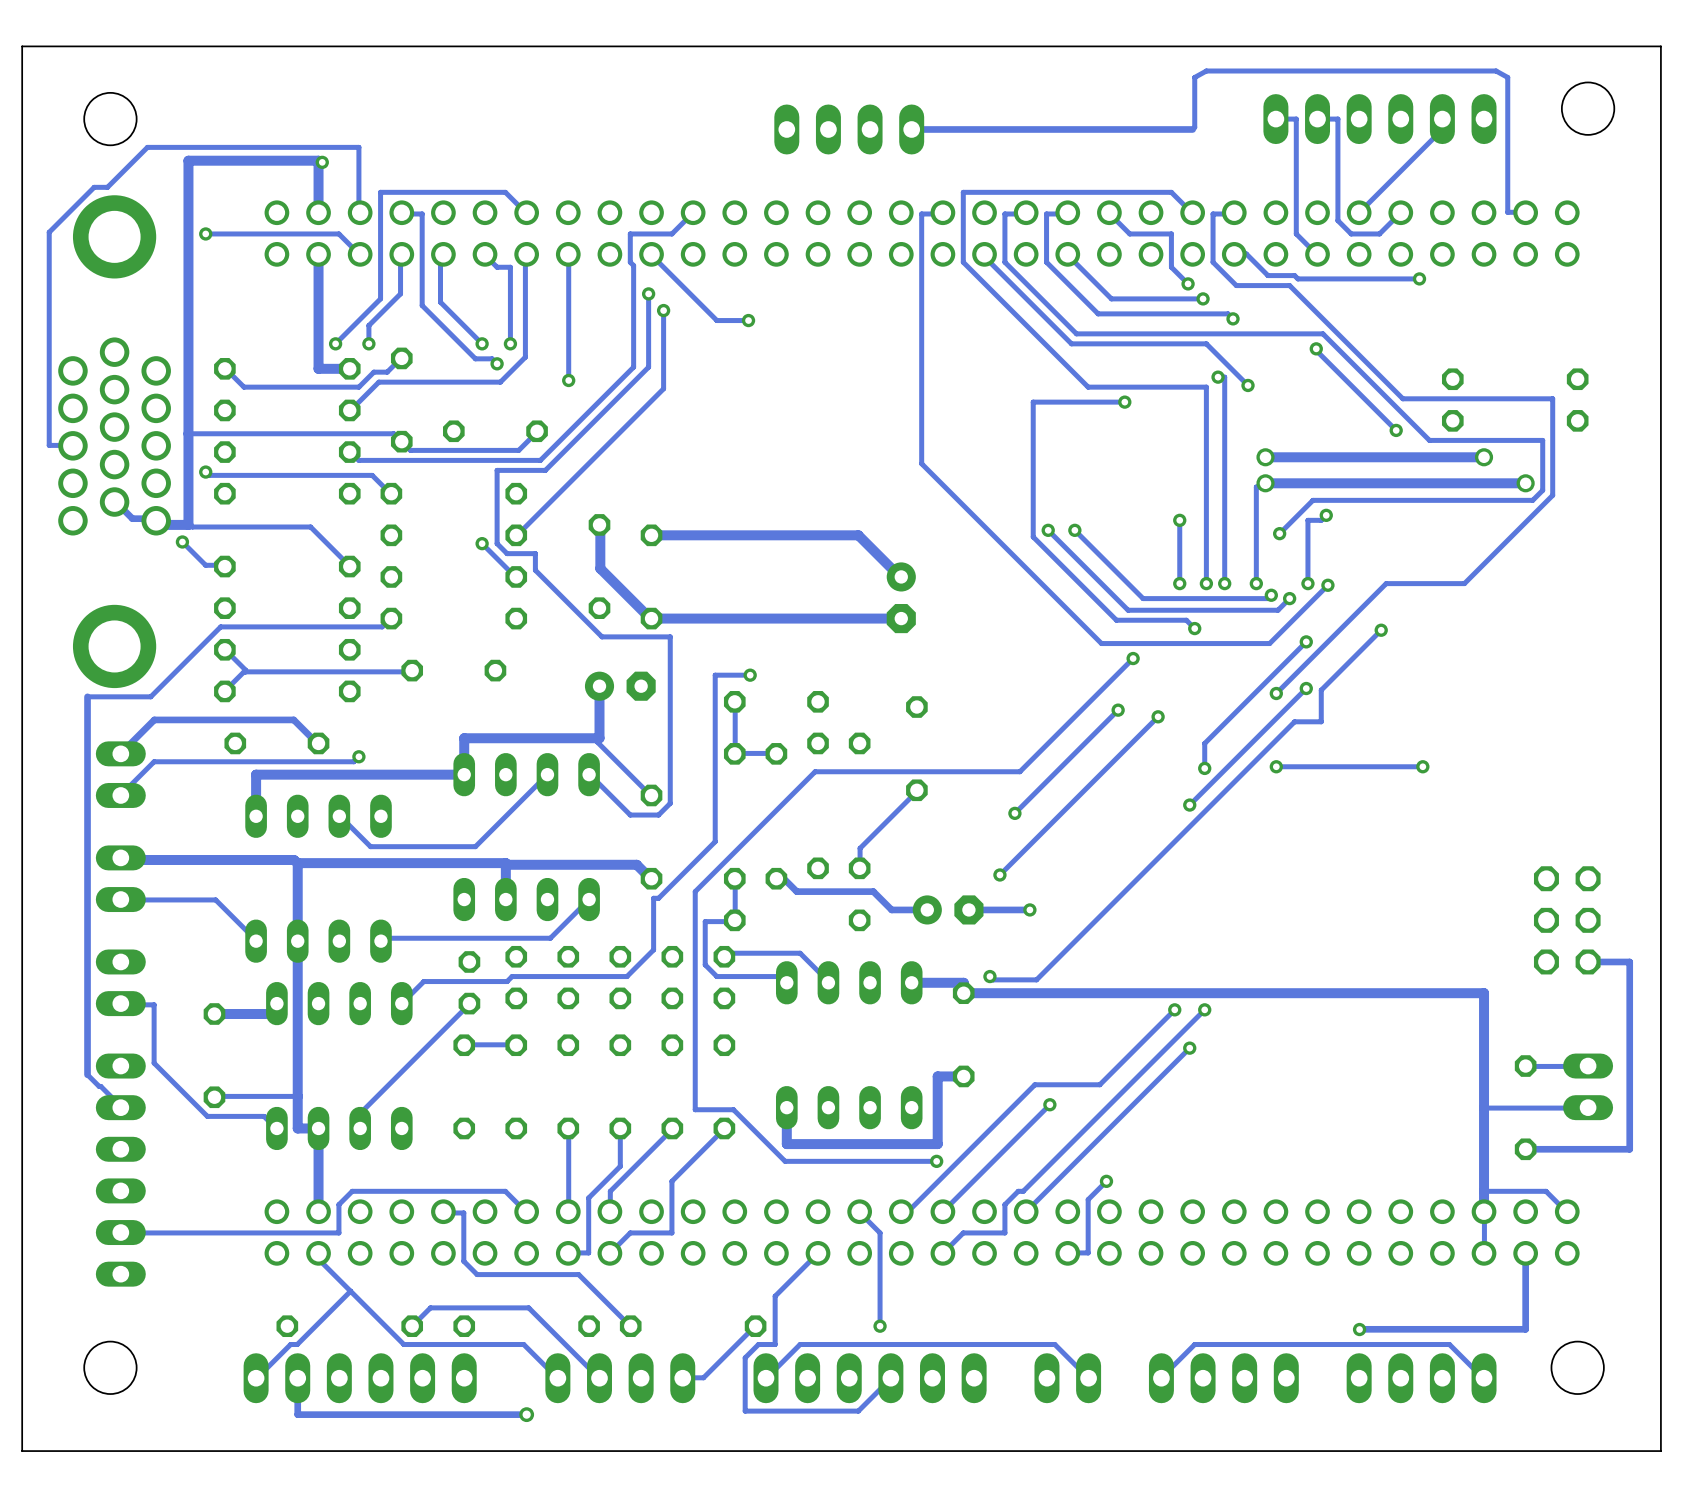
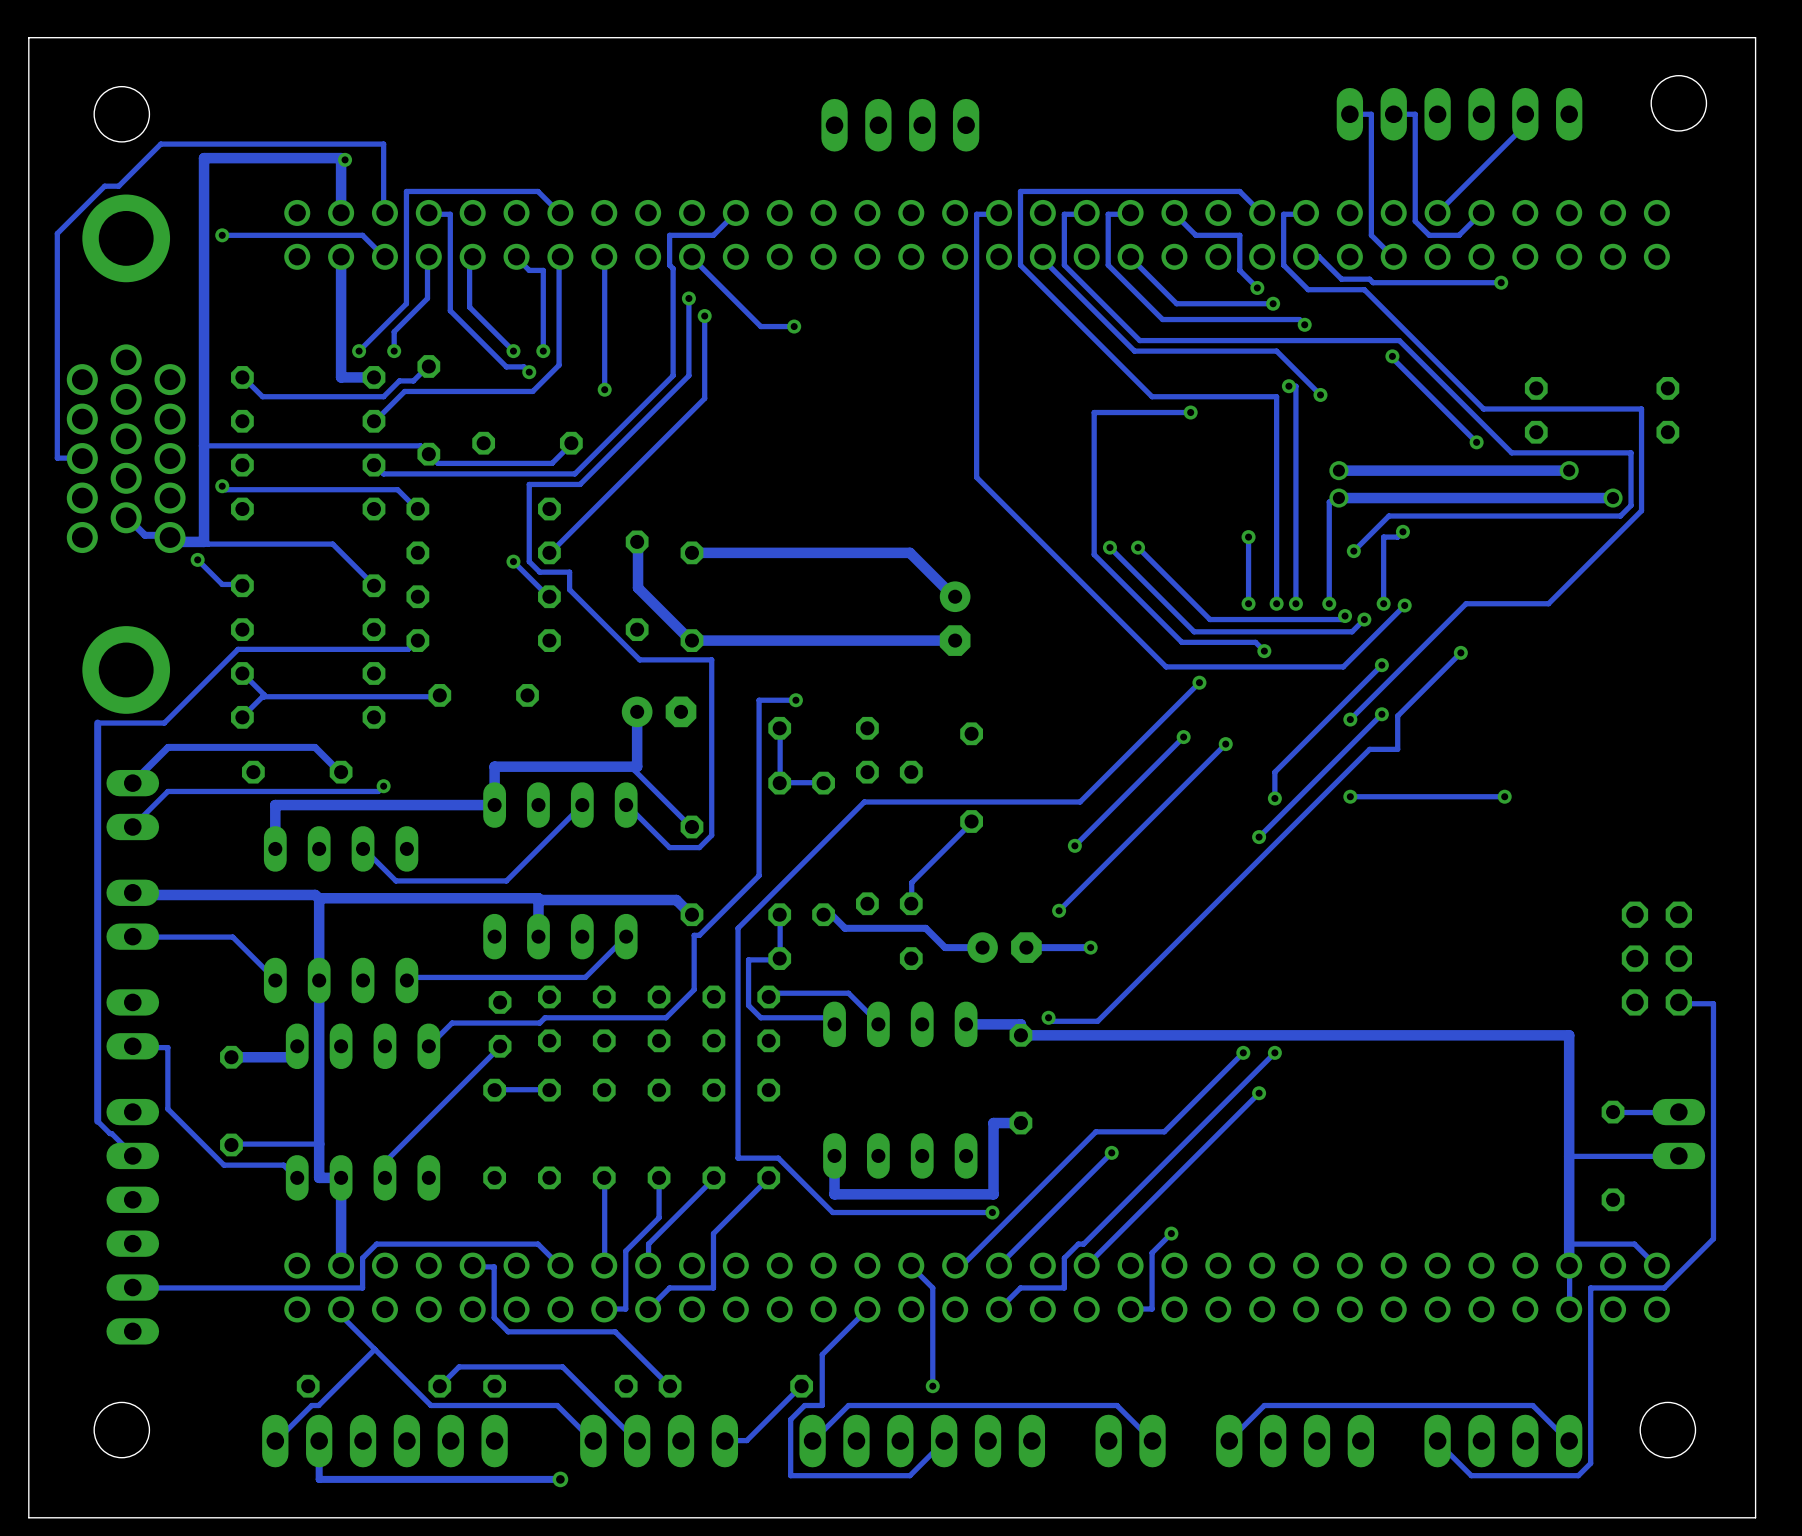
track: (911, 129) (1192, 129) (1194, 127) (1194, 77) (1206, 71) (1496, 71) (1507, 77) (1507, 212) (1525, 212) -> none
track: (1588, 961) (1629, 961) (1629, 1149) (1525, 1149) -> (1678, 1002) (1713, 1003) (1713, 1238) (1664, 1287) (1590, 1287) (1590, 1463) (1578, 1475) (1471, 1475) (1437, 1441)
track: (1525, 1253) (1525, 1329) (1359, 1329) -> none
via: (1359, 1329) -> none

